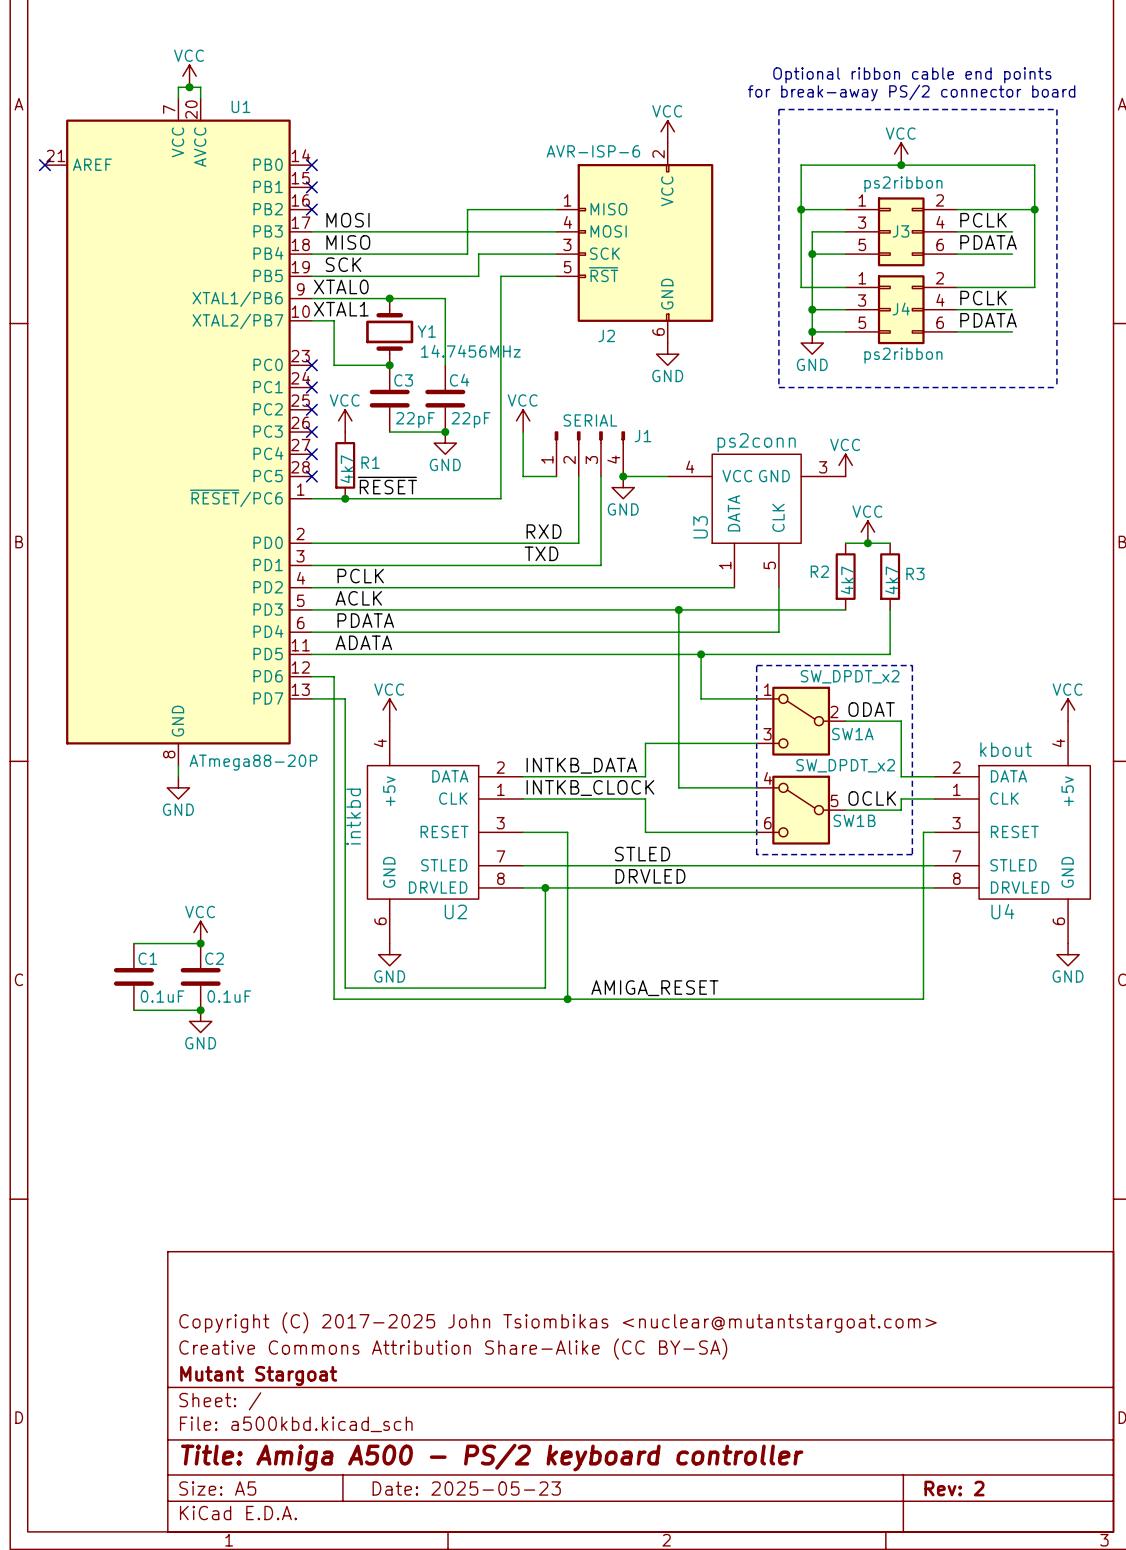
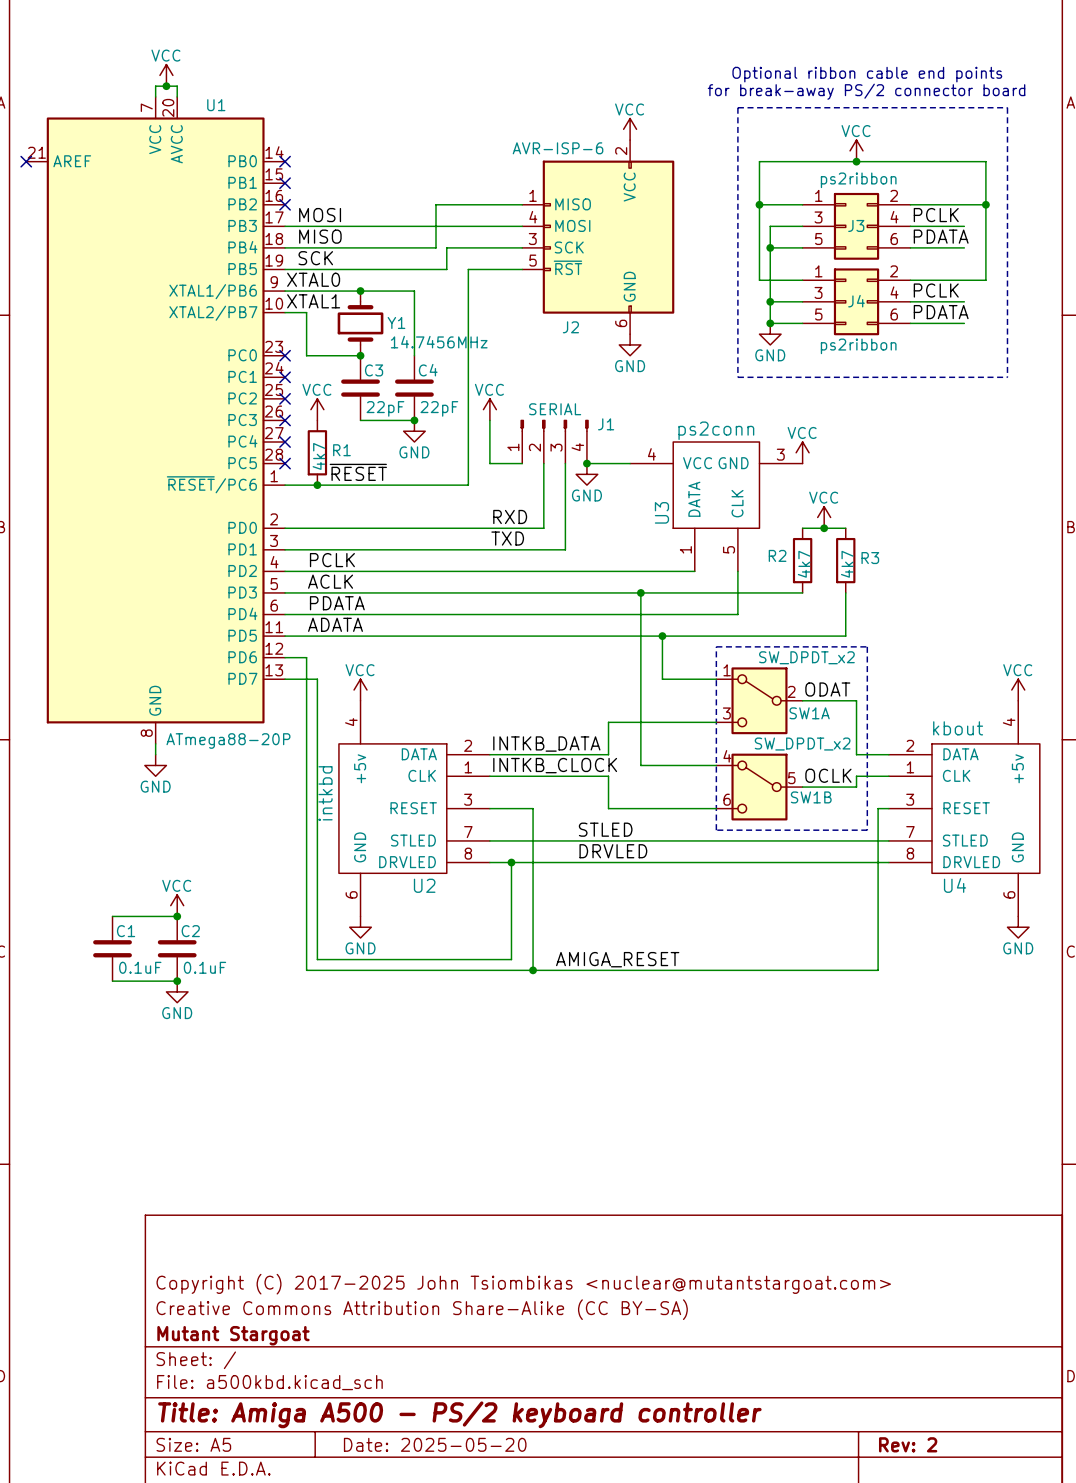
title block: Date: 2025-05-23 (466, 1488) -> Date: 2025-05-20 (435, 1444)

